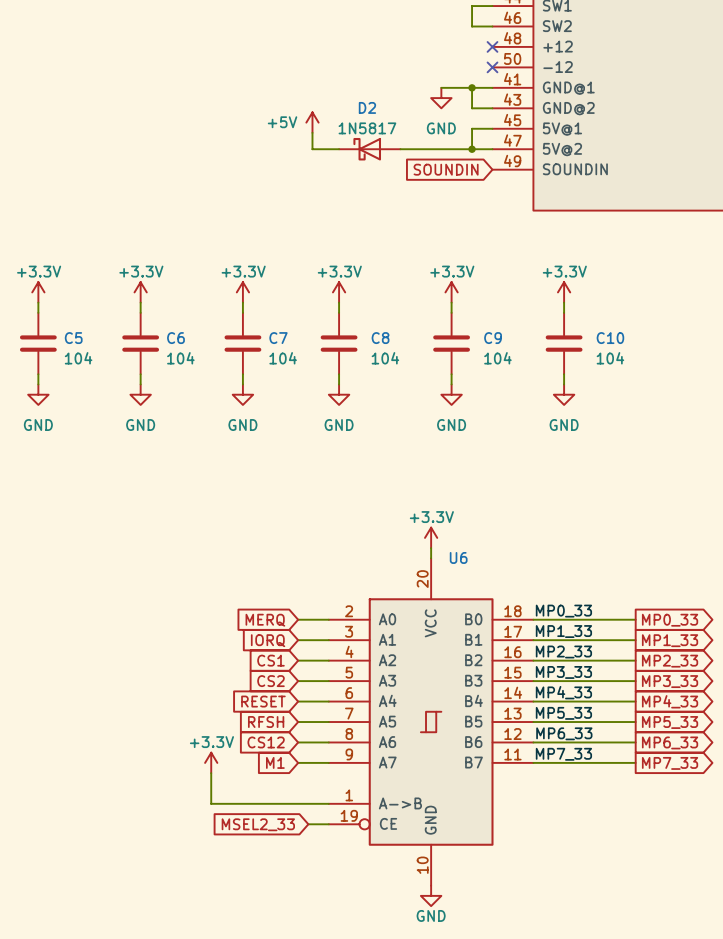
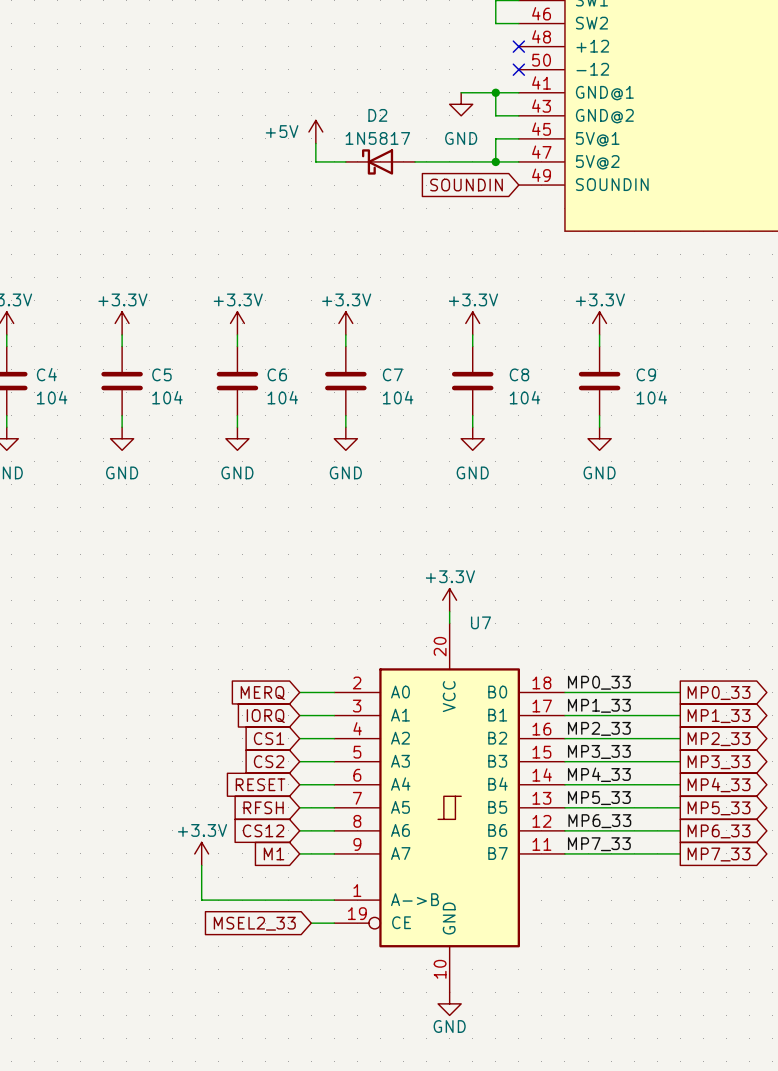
C5 name: C5 (73, 338) -> C4 (46, 374)
C6 name: C6 (175, 338) -> C5 (161, 374)
C7 name: C7 (278, 338) -> C6 (277, 374)
C8 name: C8 (380, 338) -> C7 (392, 374)
C9 name: C9 (493, 338) -> C8 (519, 374)
C10 name: C10 (610, 338) -> C9 (646, 374)
U6 name: U6 (458, 557) -> U7 (480, 622)

